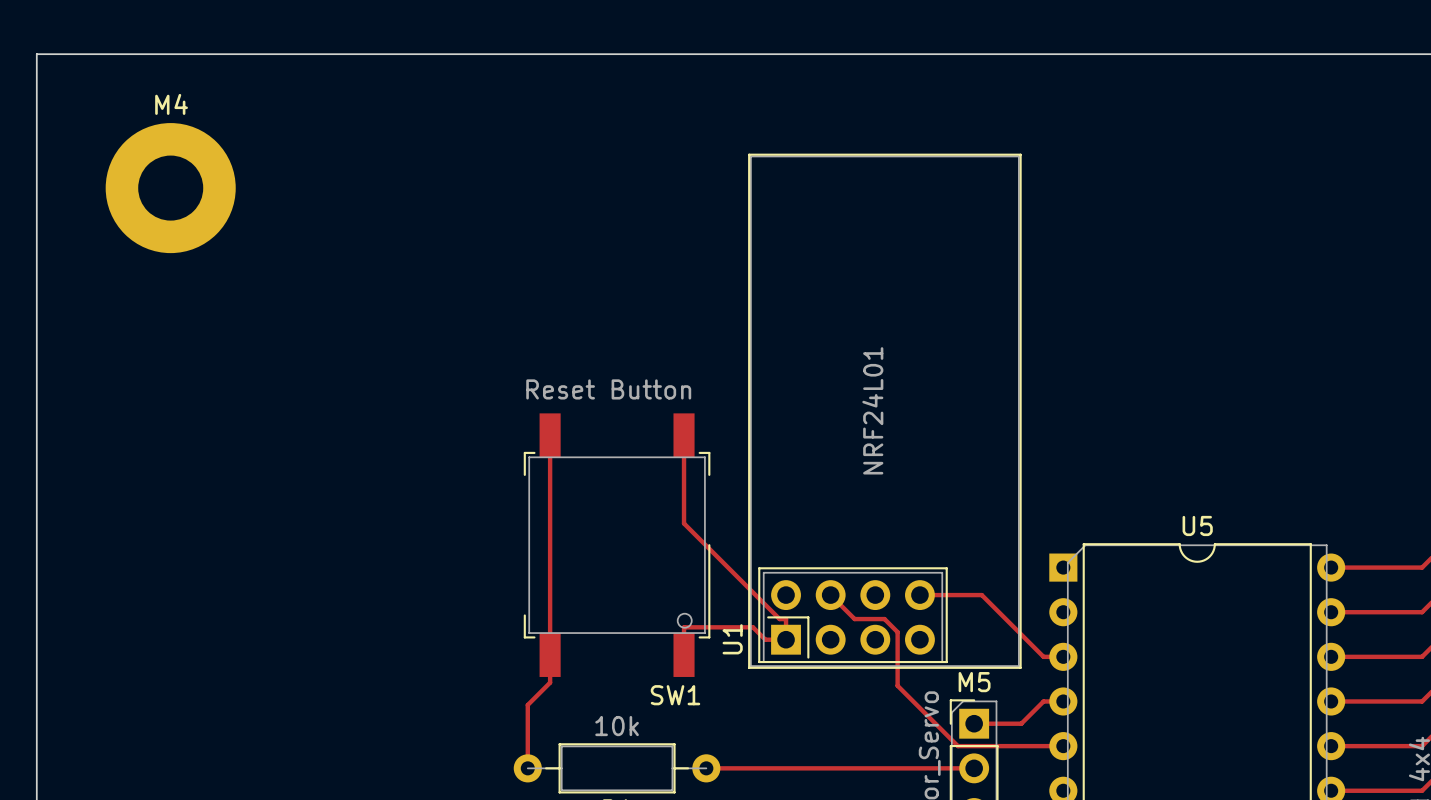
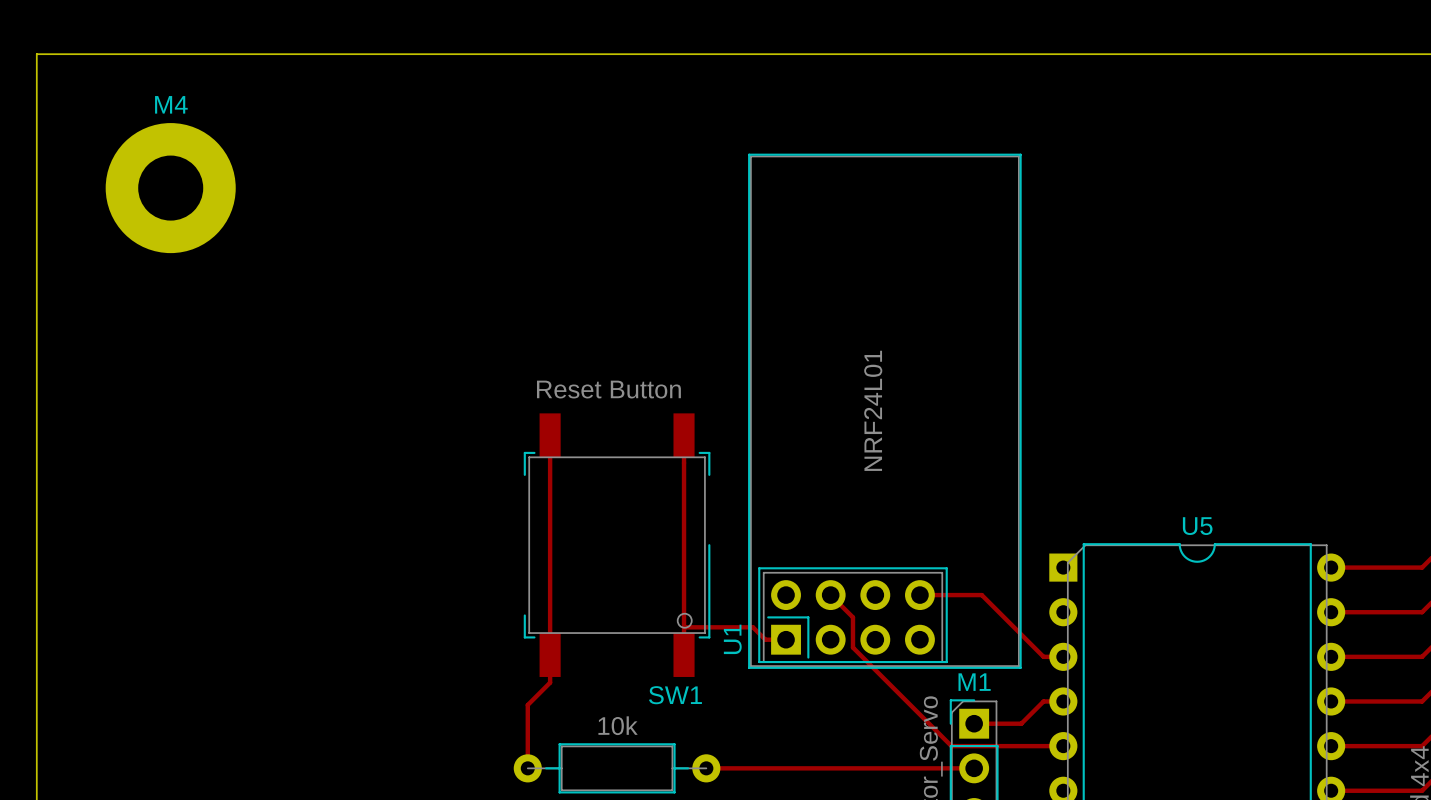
track: (684, 523) (779, 619) (786, 619) (786, 639) -> (684, 523) (684, 627)
track: (852, 617) (854, 619) (884, 619) (897, 632) (897, 685) (957, 746) -> (852, 617) (852, 647) (951, 746) (957, 746)
M5 name: M5 (974, 682) -> M1 (974, 682)

